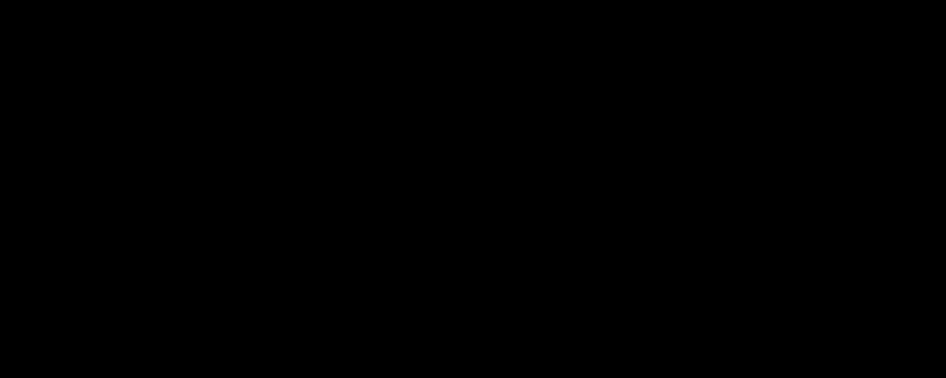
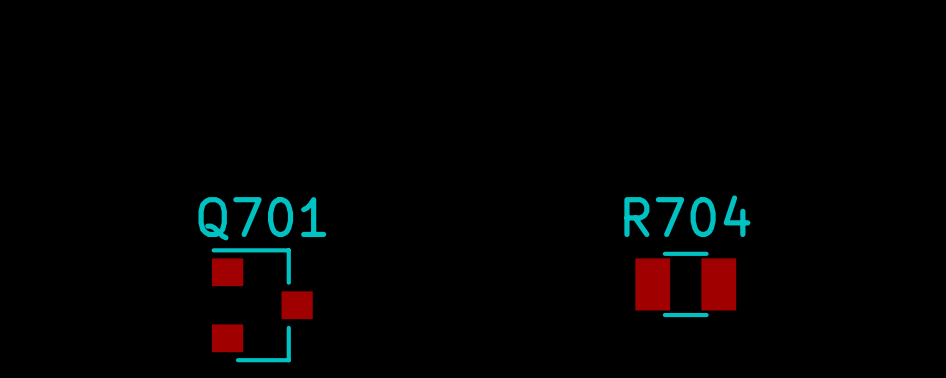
R704: none -> (685, 284)
Q701: none -> (262, 305)

